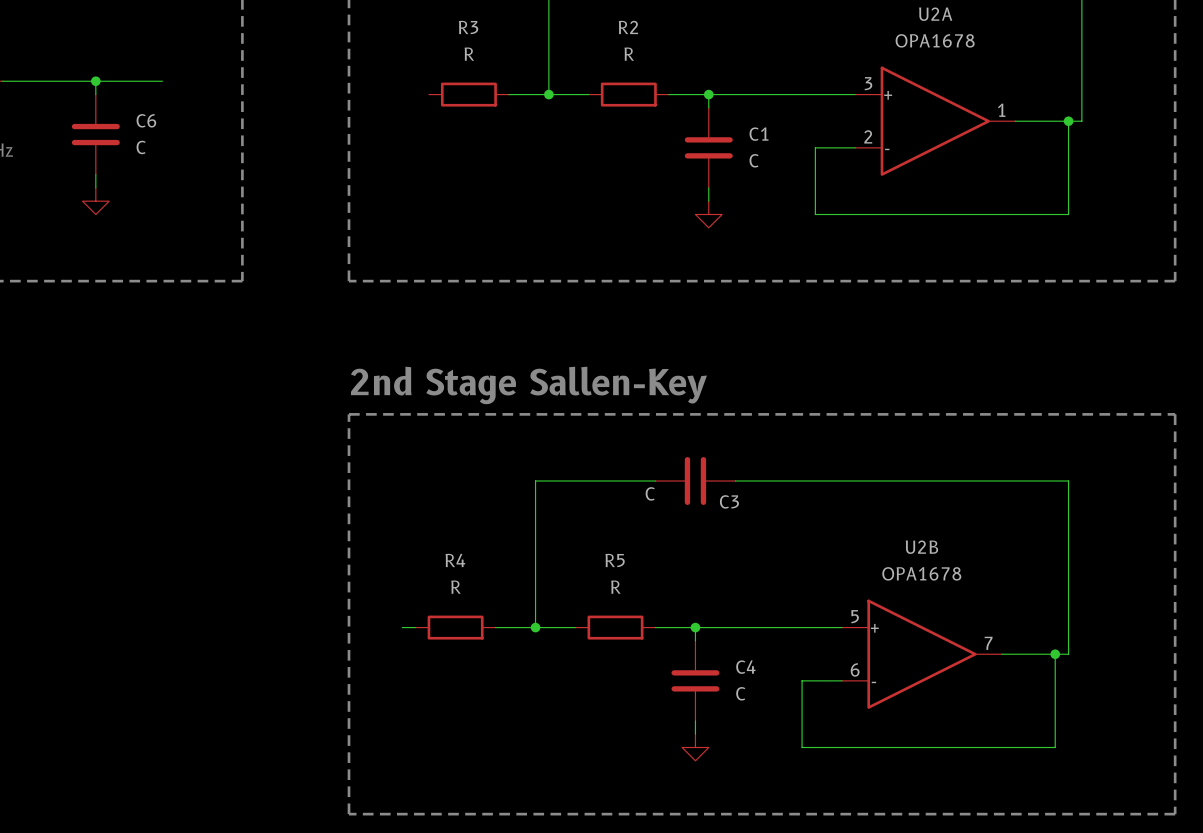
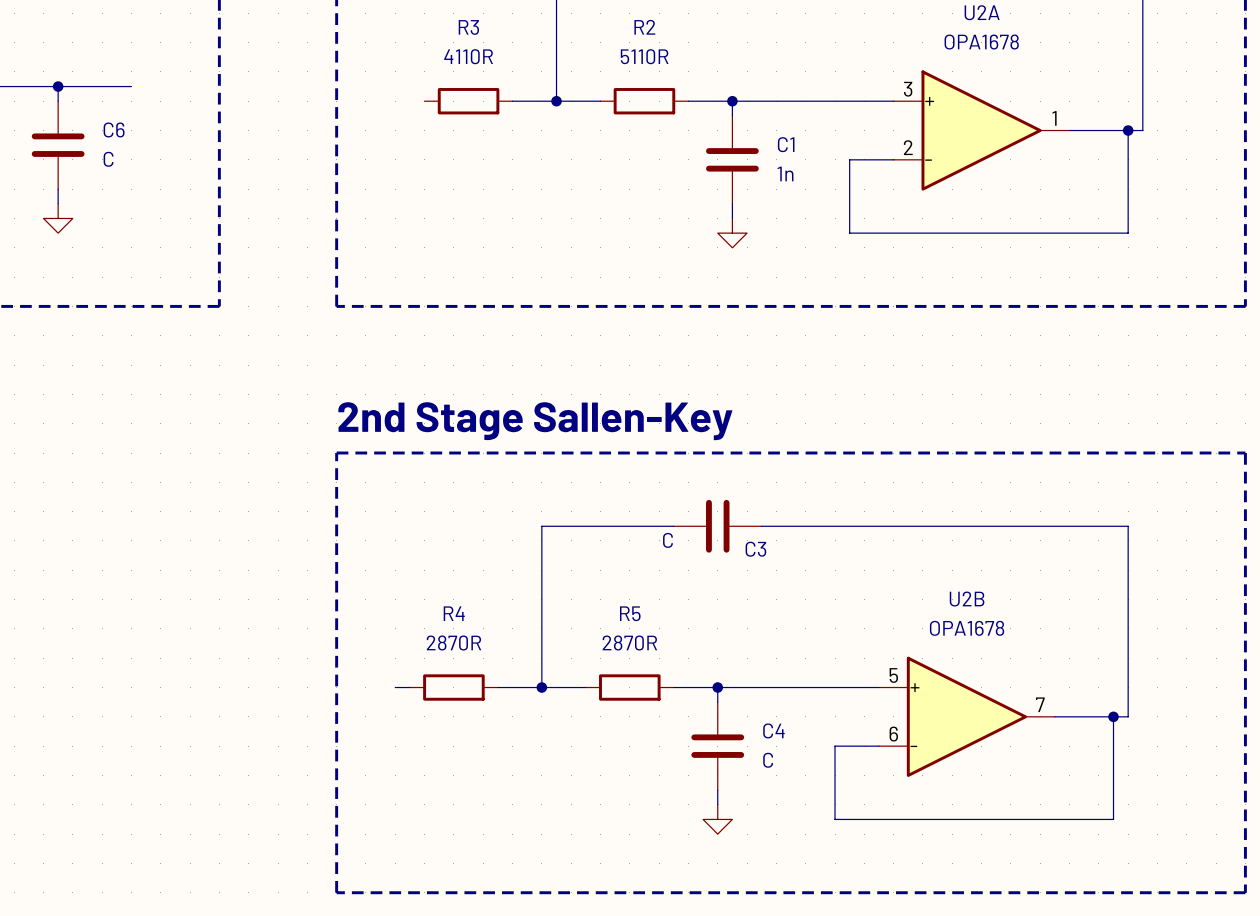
R3 value: R (469, 54) -> 4110R (468, 56)
R2 value: R (629, 54) -> 5110R (644, 56)
C1 value: C (754, 160) -> 1n (785, 173)
R4 value: R (455, 587) -> 2870R (453, 643)
R5 value: R (615, 587) -> 2870R (629, 643)

